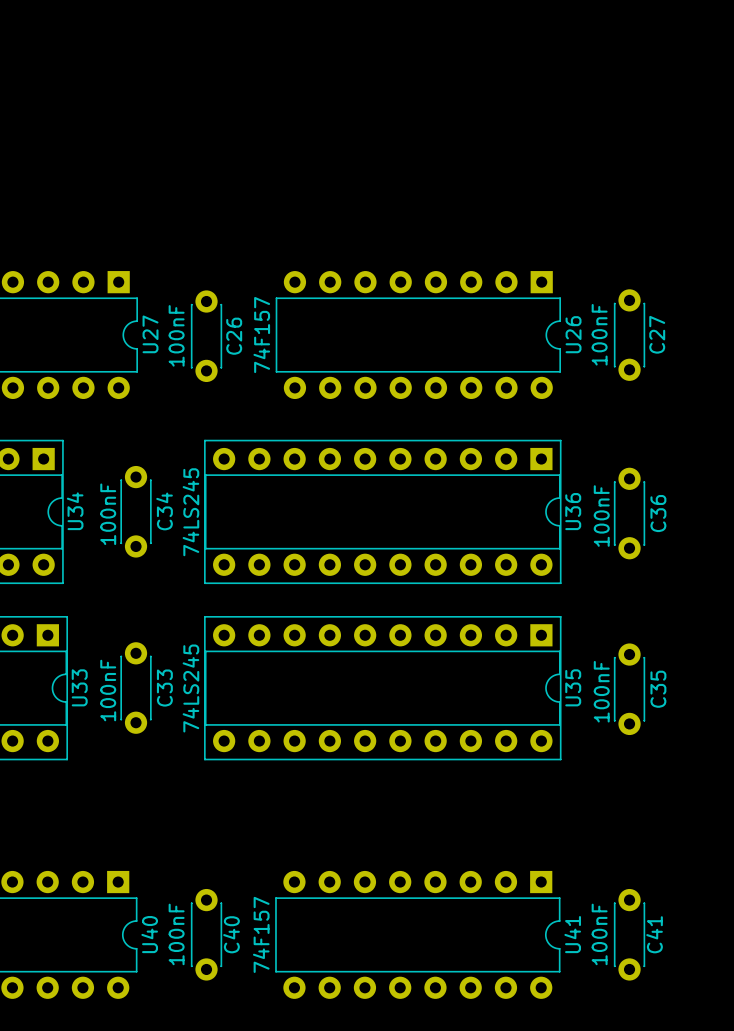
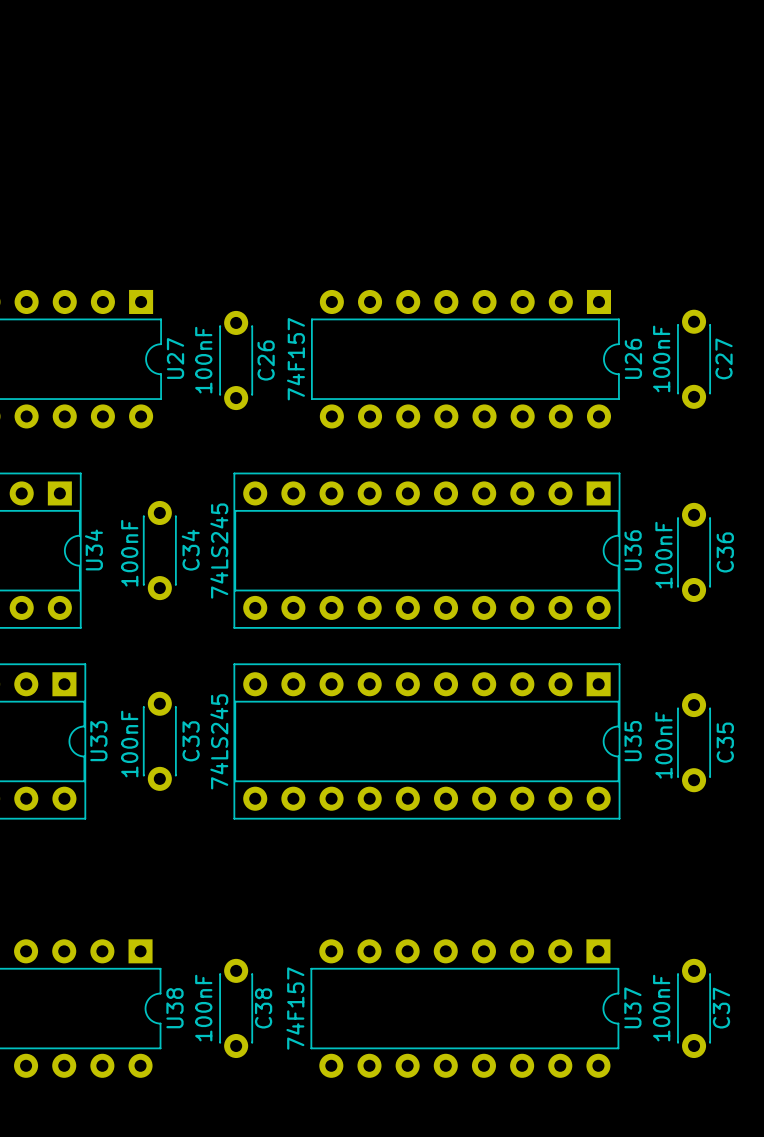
U40 name: U40 (149, 934) -> U38 (174, 1008)
C40 name: C40 (231, 934) -> C38 (263, 1008)
U41 name: U41 (572, 934) -> U37 (632, 1007)
C41 name: C41 (654, 934) -> C37 (721, 1008)

